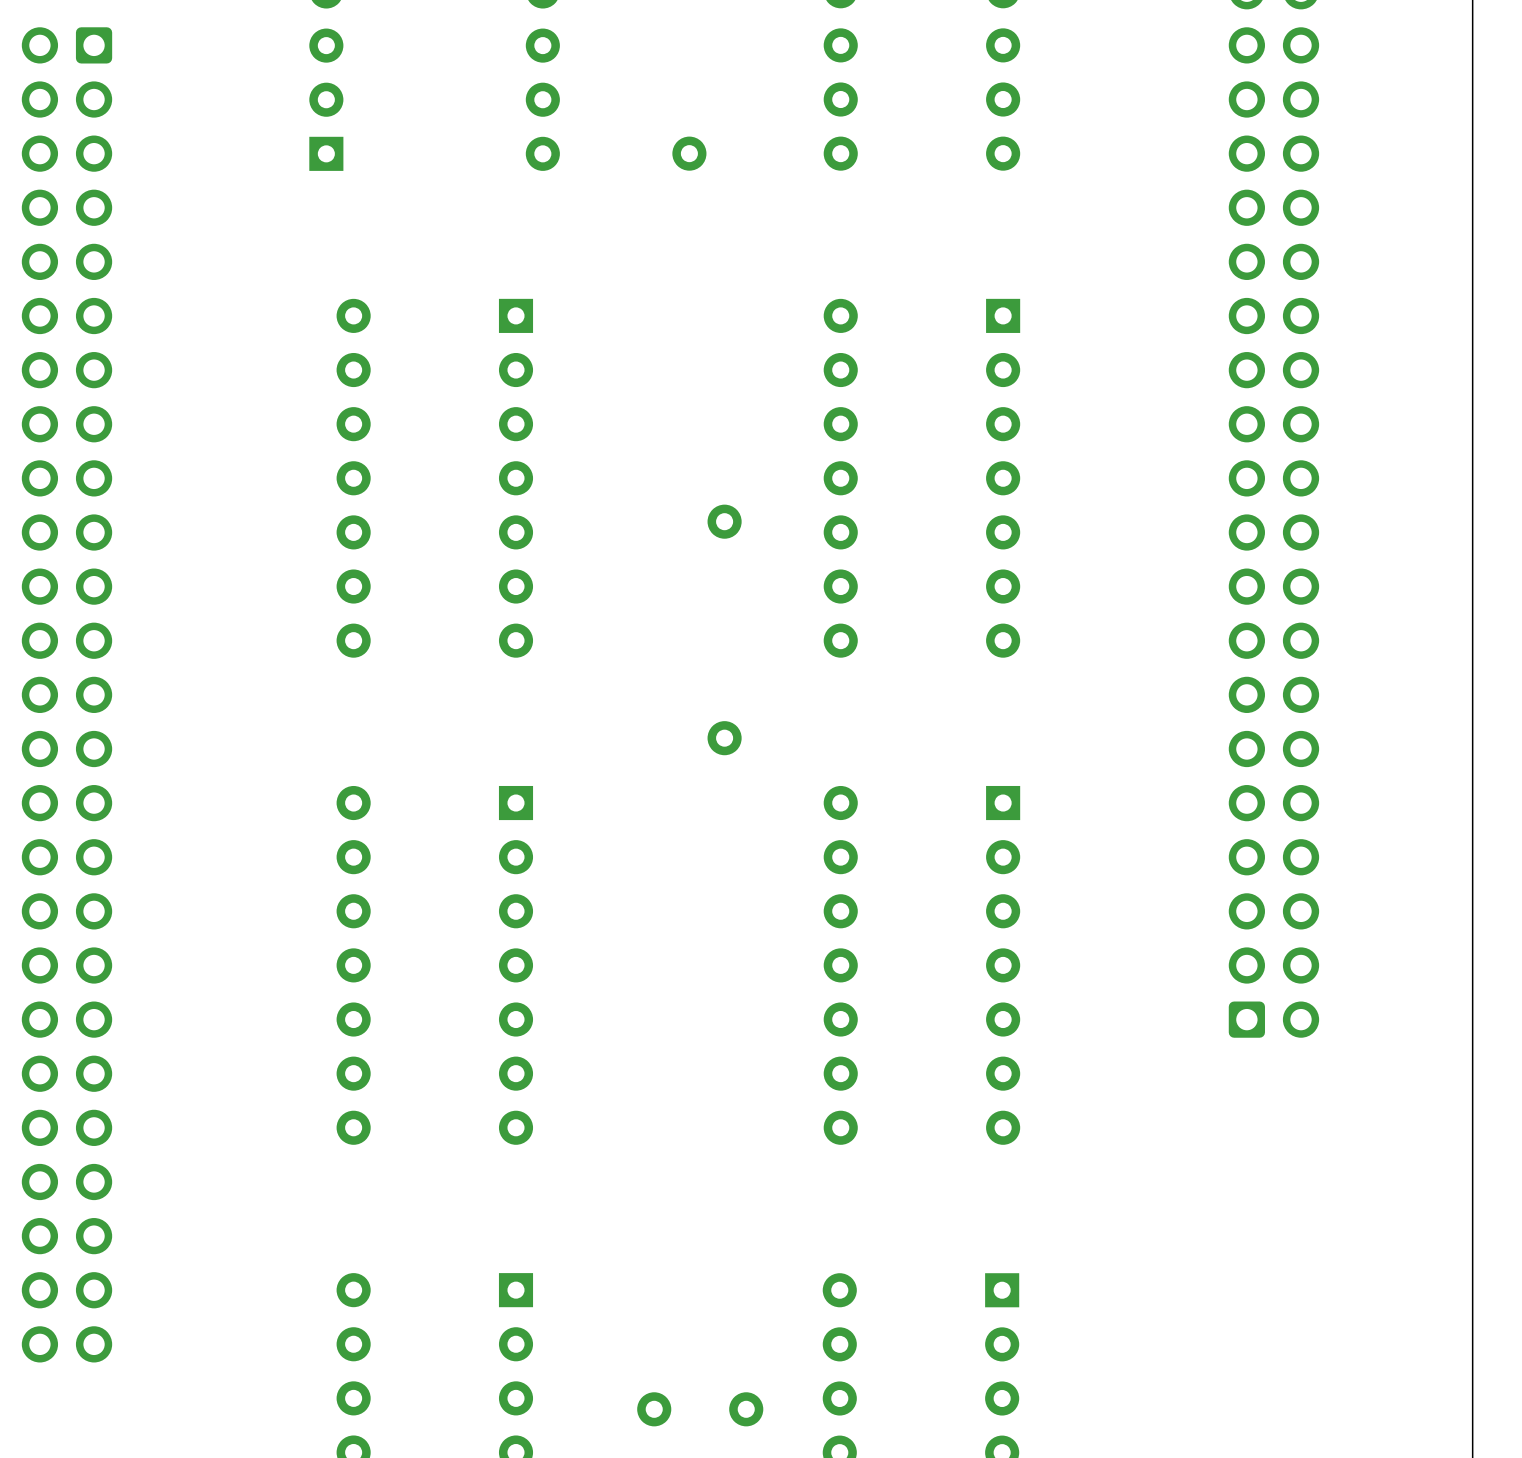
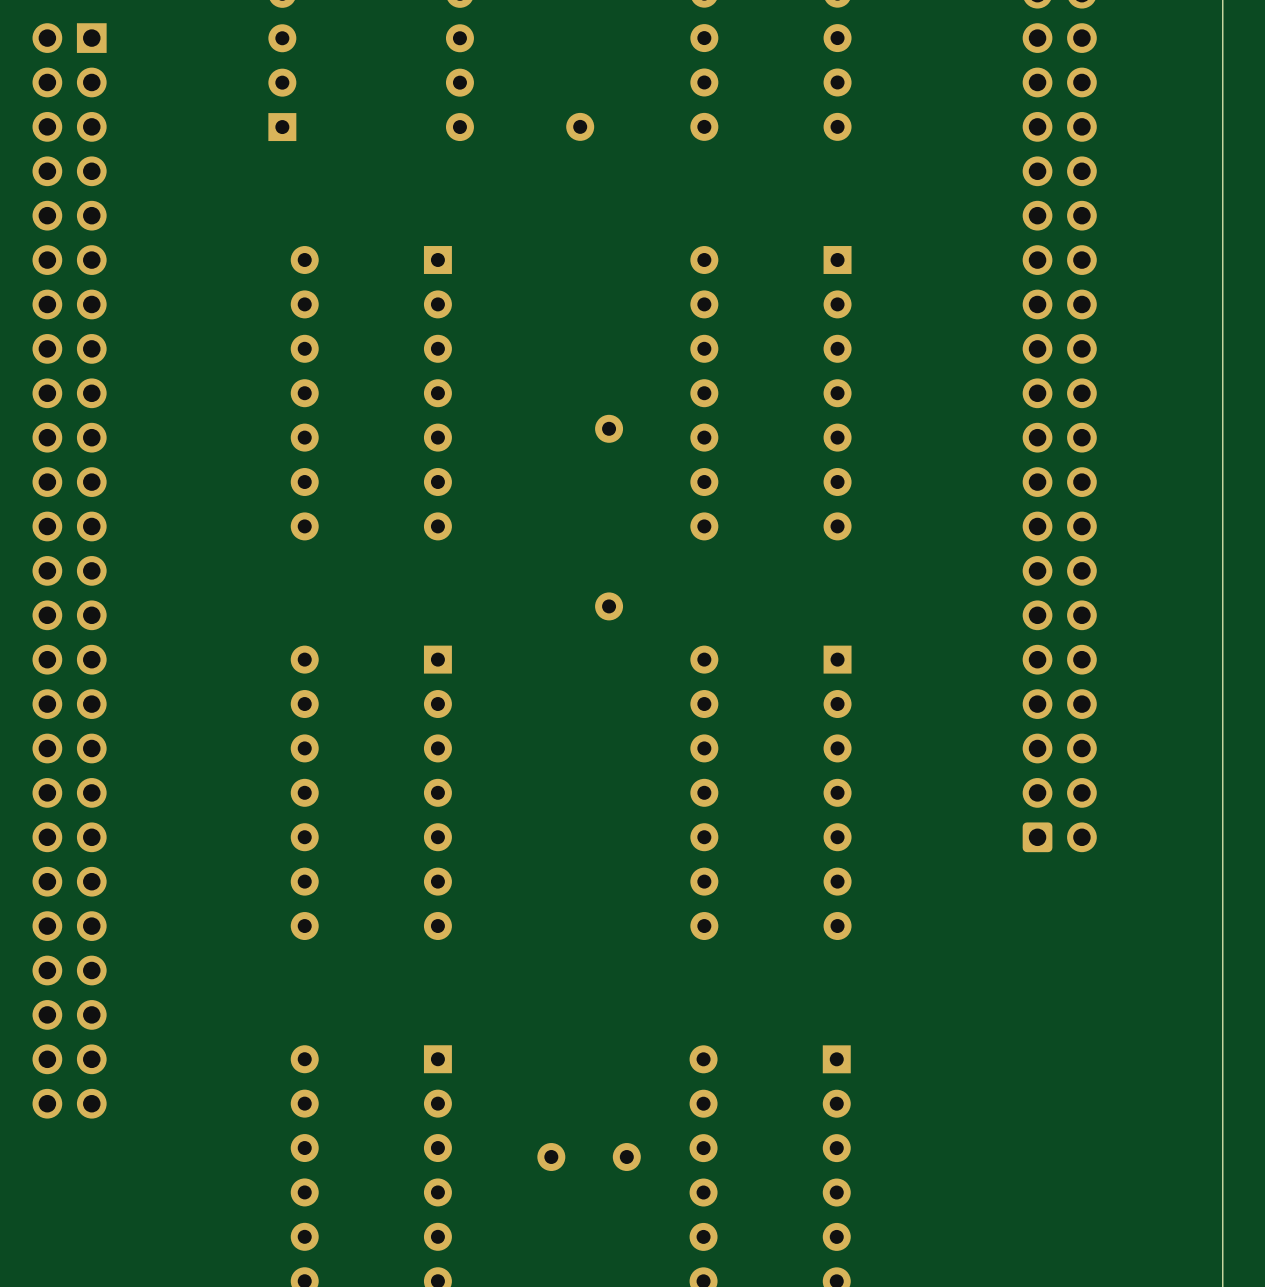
part footprint: [21, 27, 113, 1363] -> [32, 23, 107, 1119]

